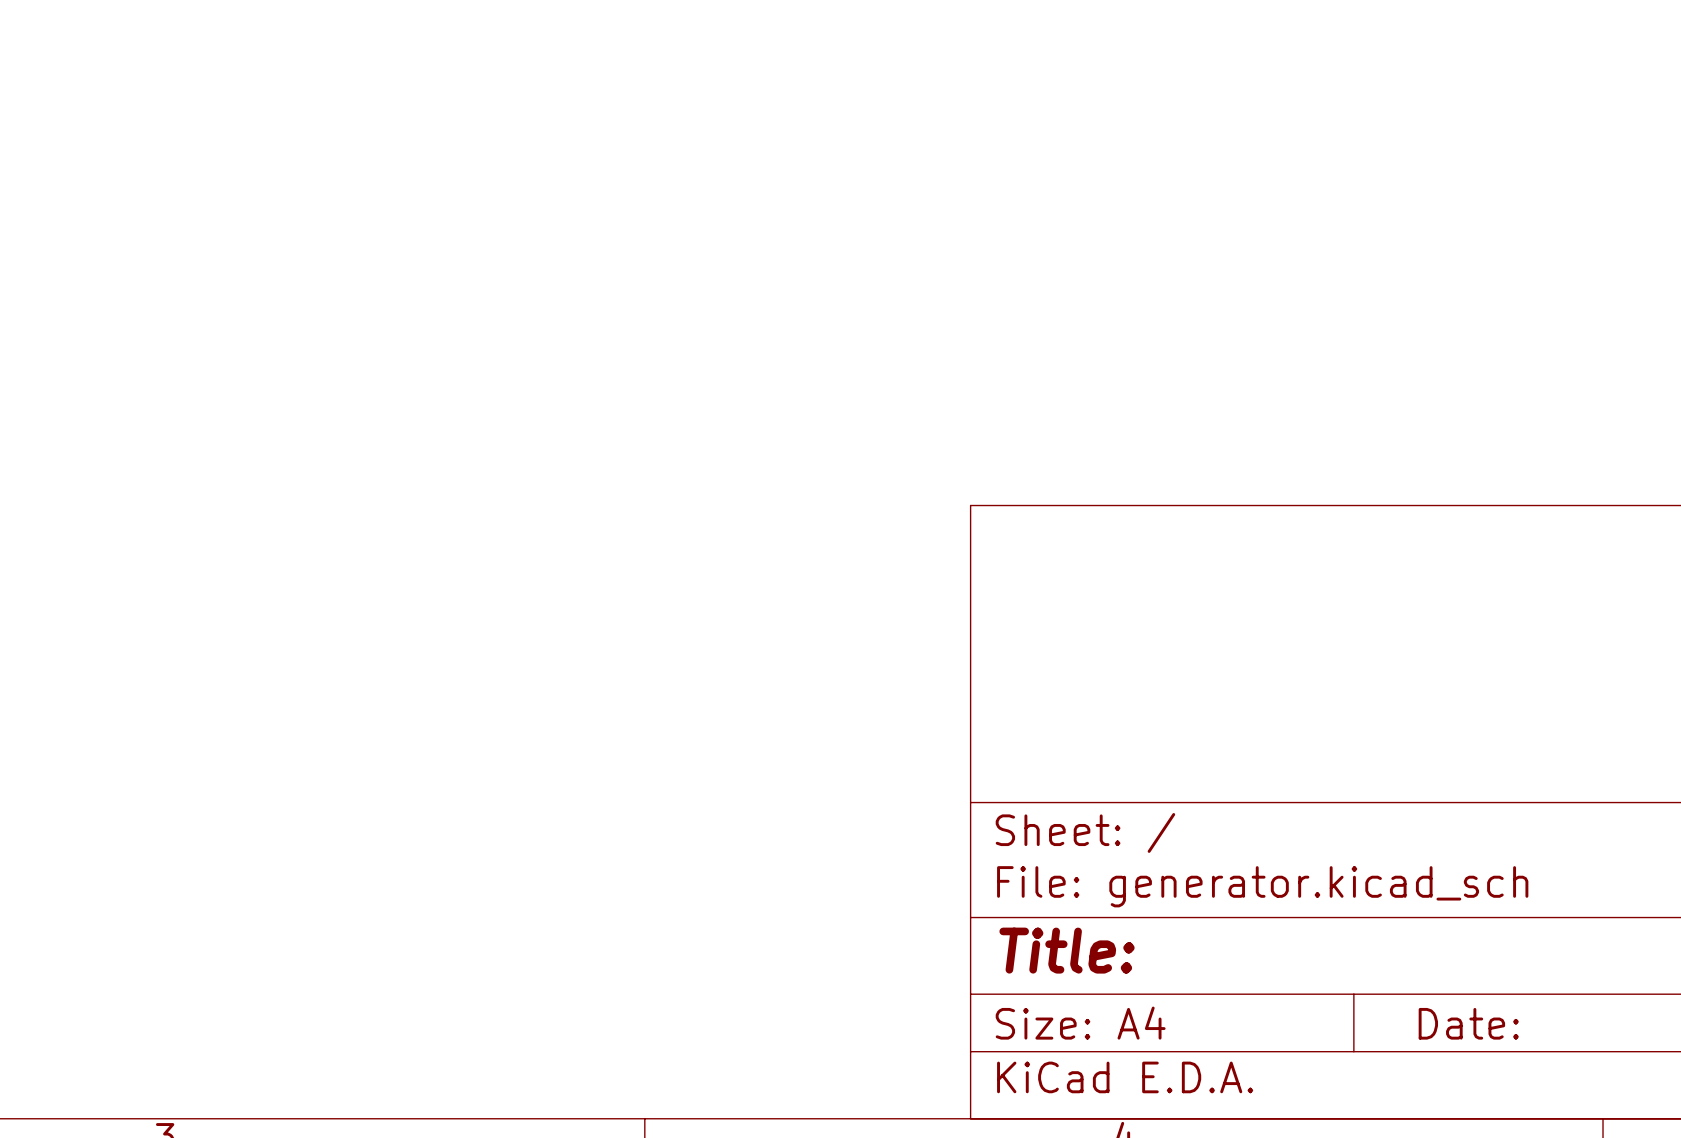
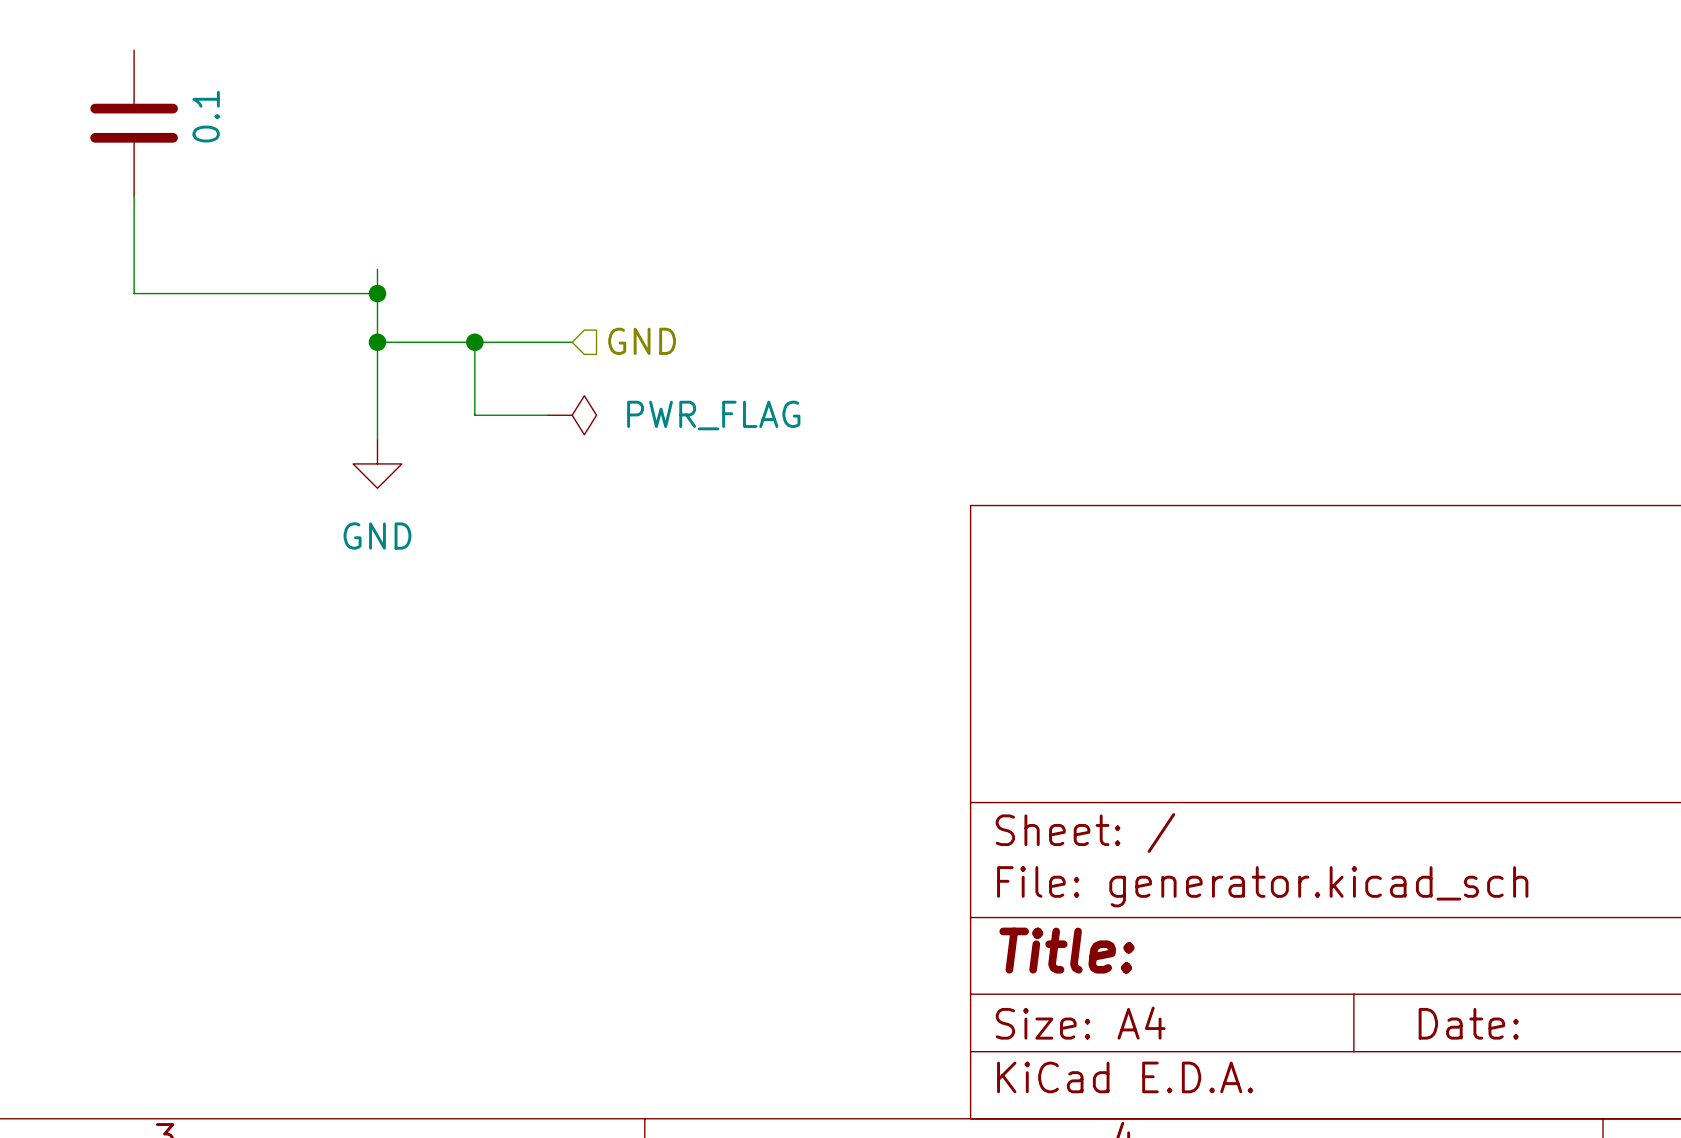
part: none -> 0.1 (134, 123)
wire: none -> (134, 196) (134, 293) (377, 293)
wire: none -> (377, 269) (377, 439)
junction: none -> (377, 293)
hierarchical label: none -> GND (642, 341)
wire: none -> (377, 342) (572, 342)
junction: none -> (377, 342)
wire: none -> (474, 342) (474, 415) (547, 415)
junction: none -> (474, 342)
power symbol: none -> PWR_FLAG (572, 415)
power symbol: none -> GND (377, 463)

